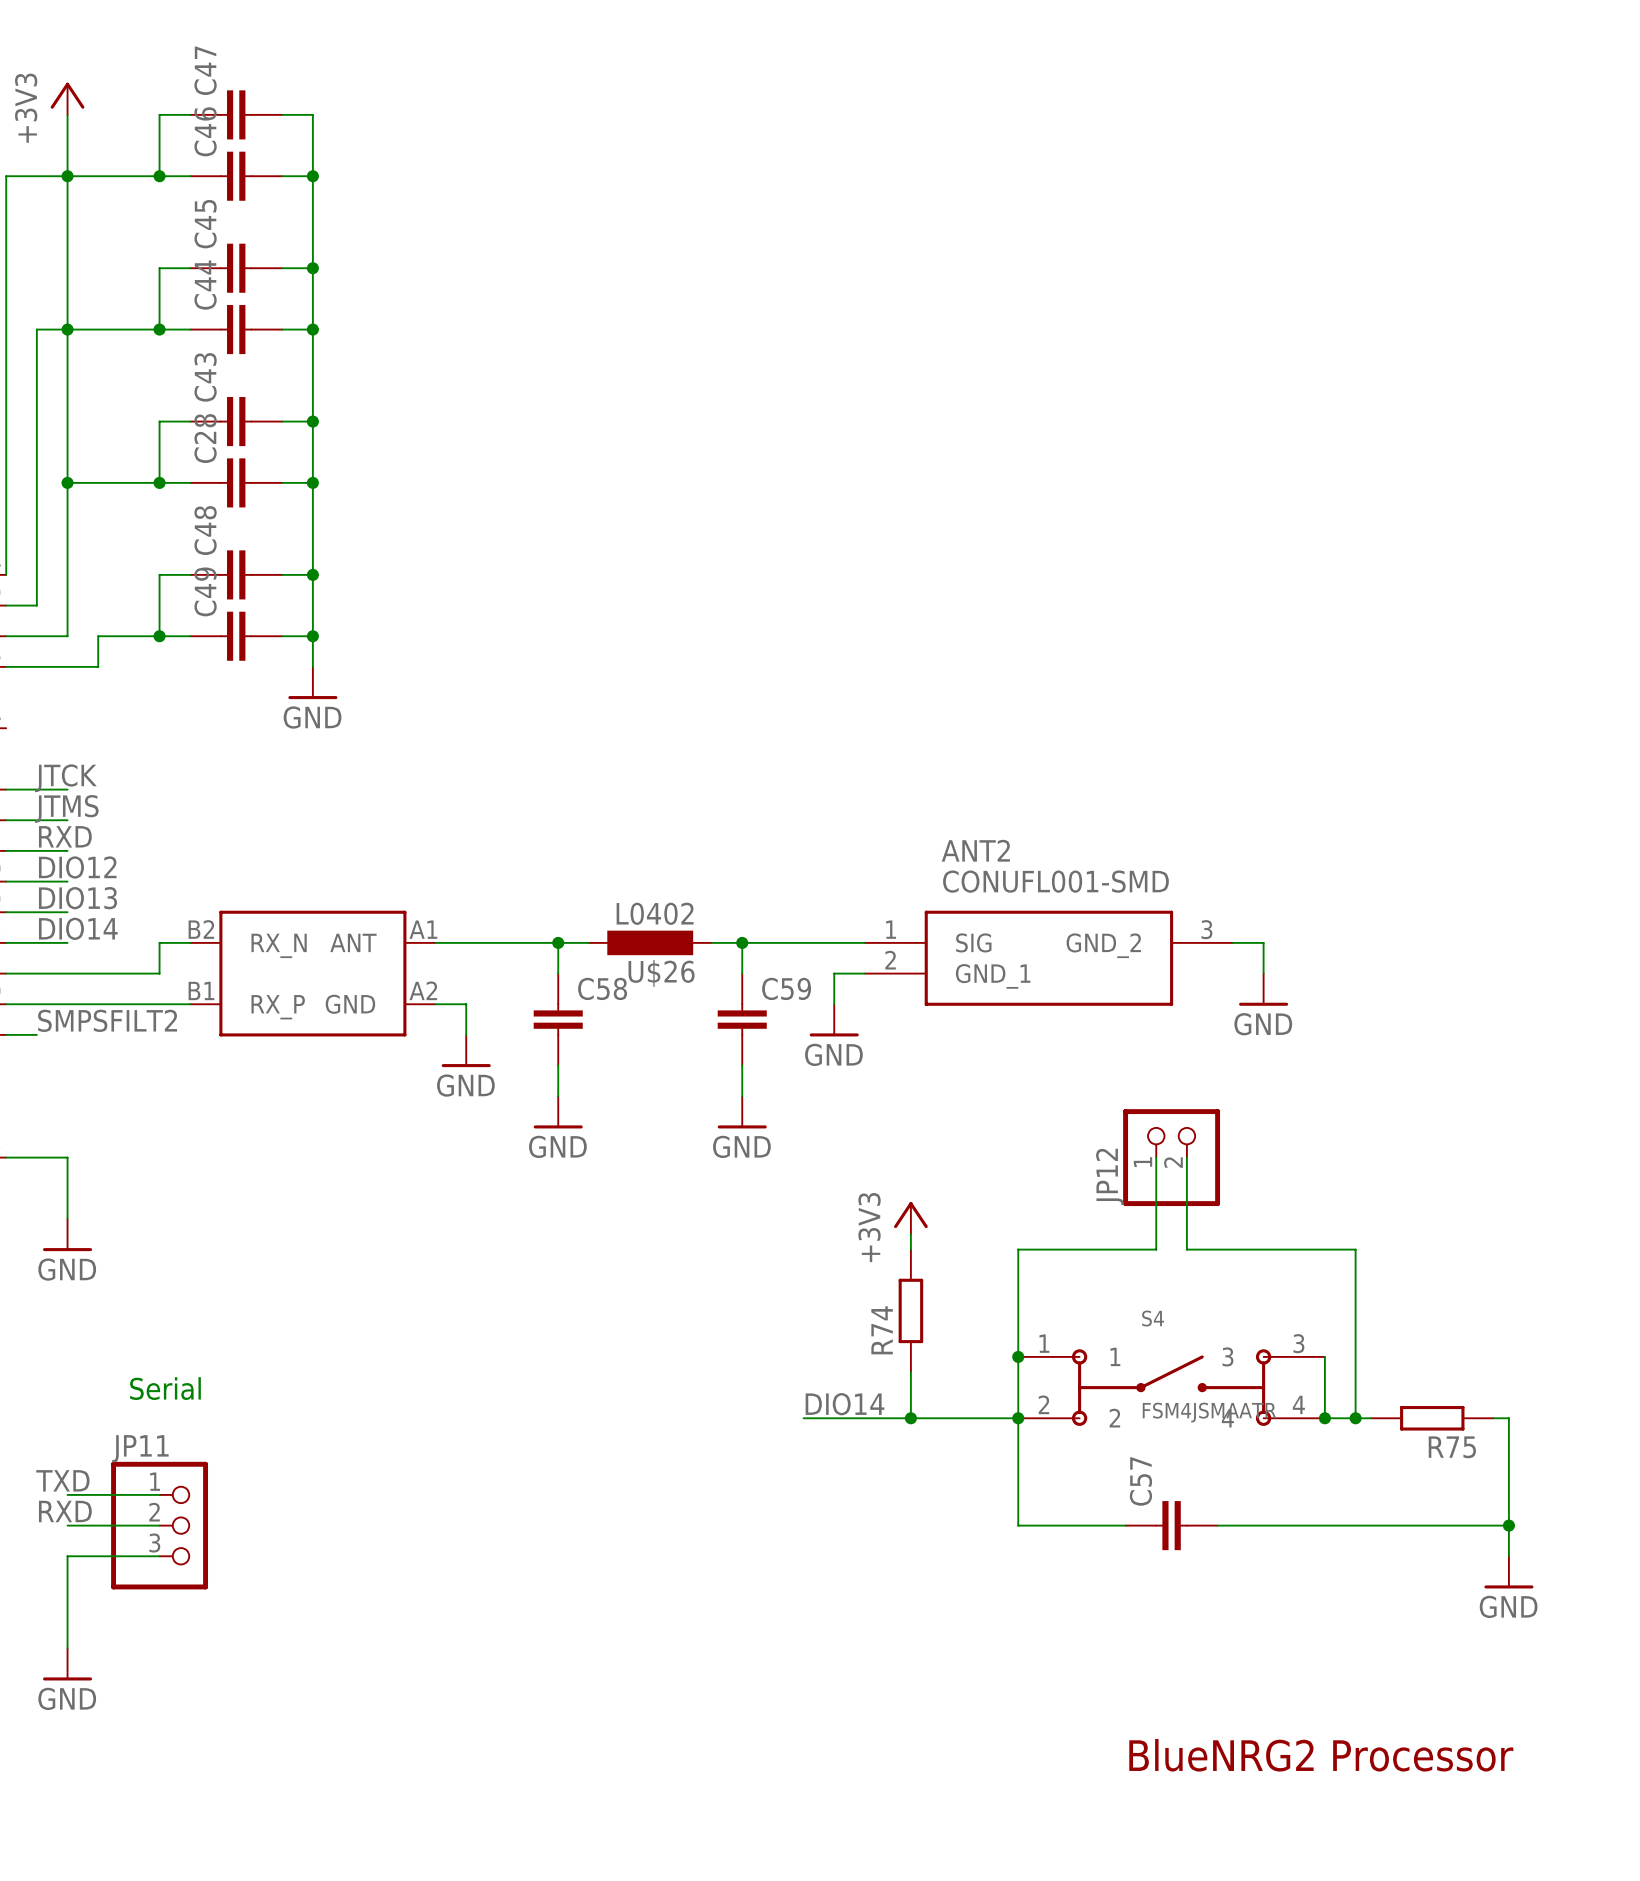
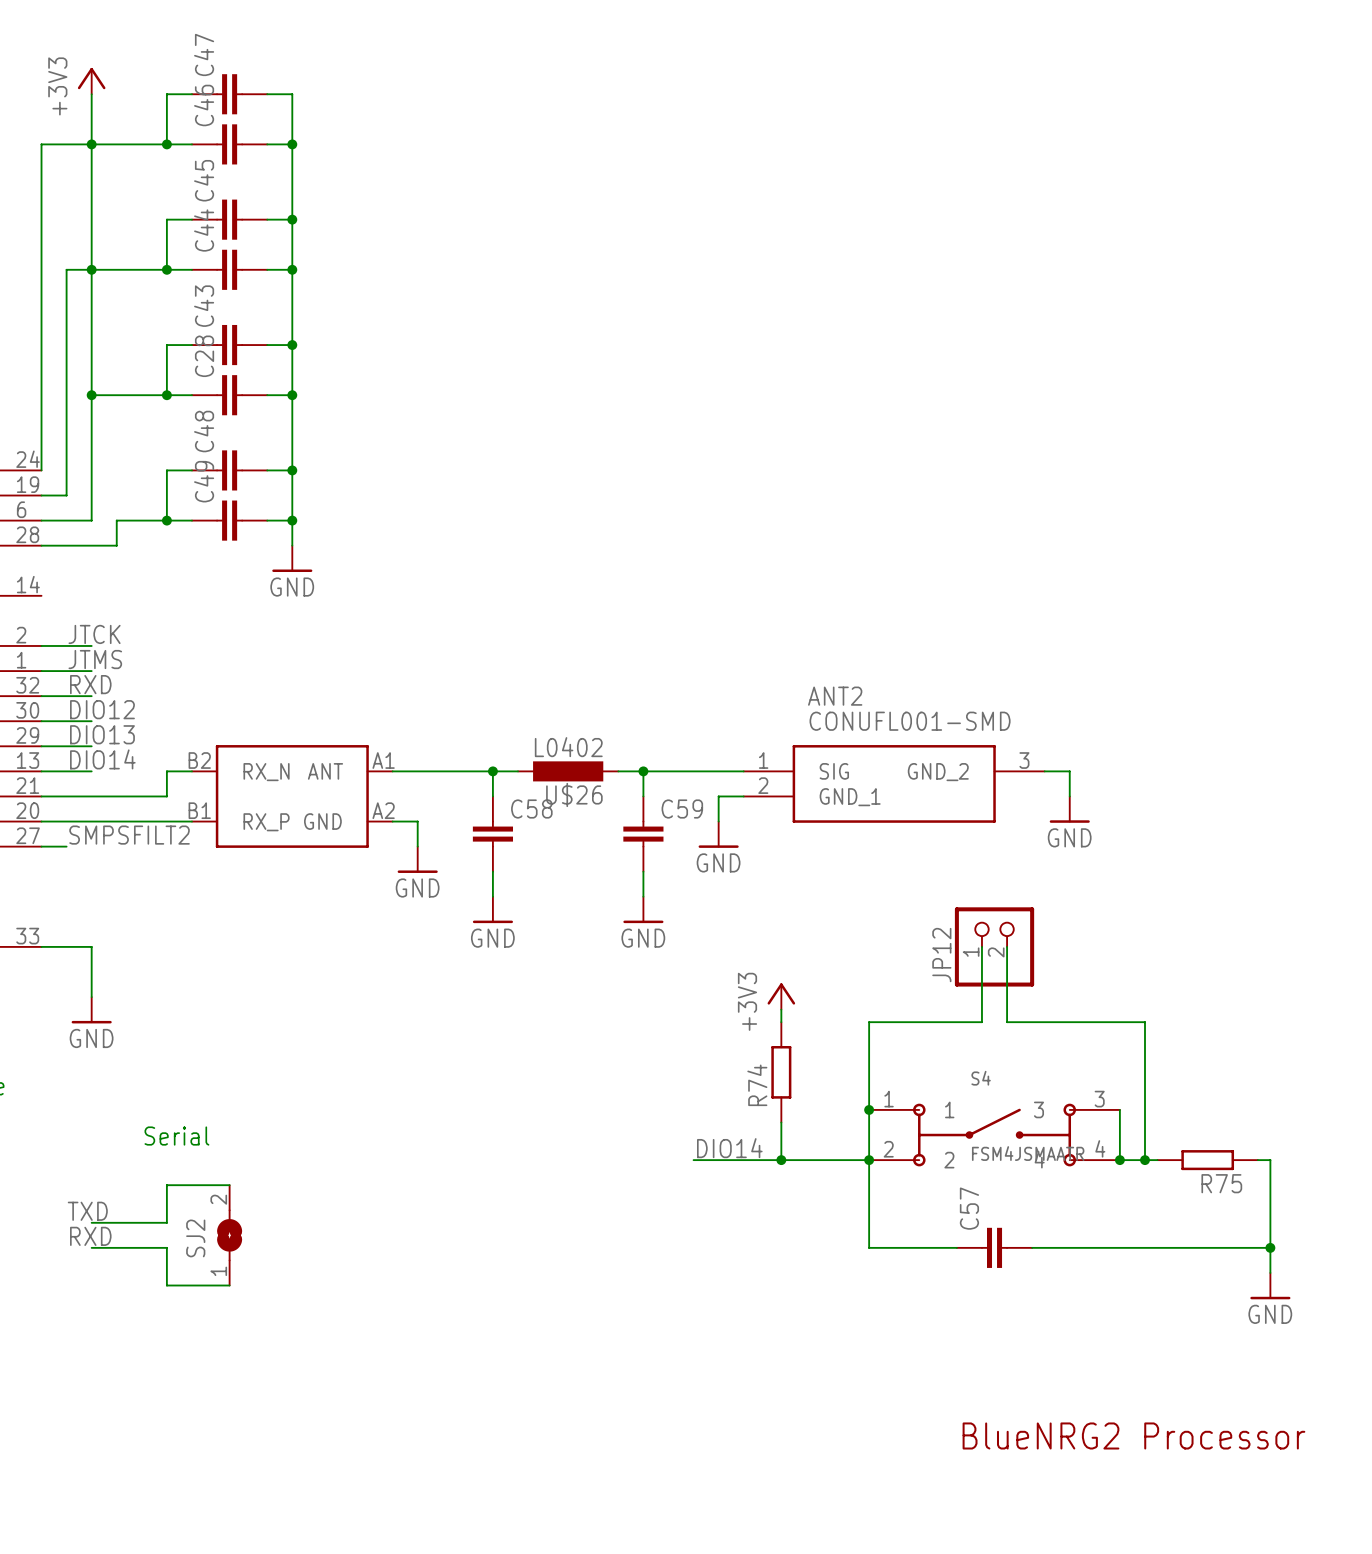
wire: none -> (229, 1185) (166, 1185) (166, 1222)
SJ2: none -> (229, 1235)
wire: none -> (166, 1247) (166, 1285) (229, 1285)
JP11: (159, 1525) -> none
wire: (159, 1556) (67, 1556) (67, 1648) -> none
power symbol: GND (67, 1664) -> none

